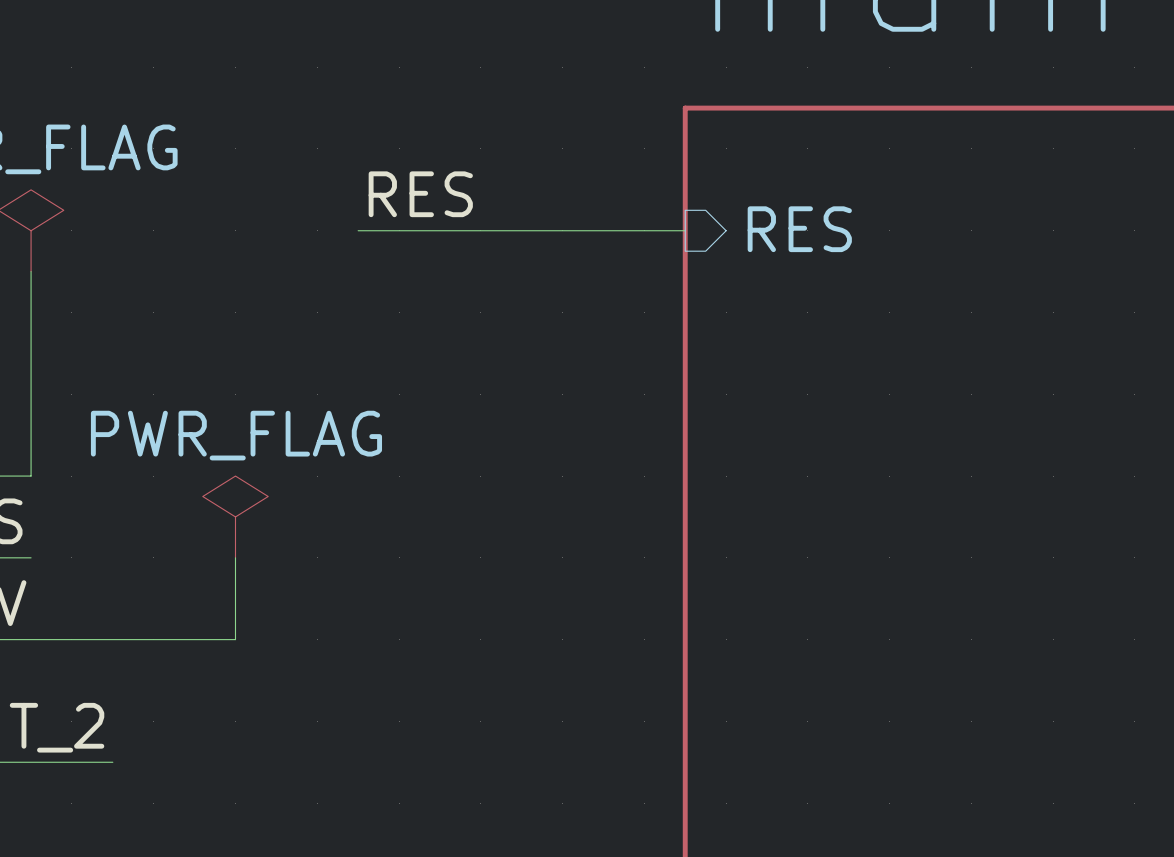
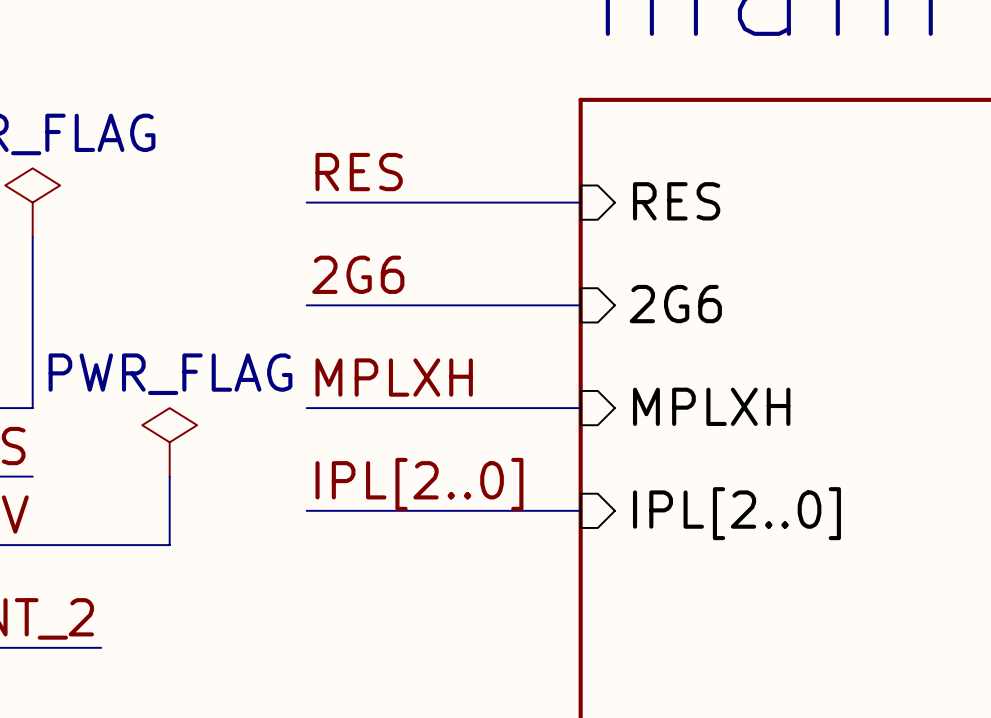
label: none -> 2G6 (358, 274)
sheet pin: none -> 2G6 (675, 304)
wire: none -> (306, 305) (580, 305)
label: none -> MPLXH (394, 377)
sheet pin: none -> MPLXH (711, 406)
wire: none -> (306, 408) (580, 408)
power symbol position: PWR_FLAG (235, 516) -> PWR_FLAG (169, 442)
wire: (235, 557) (235, 639) (194, 639) -> (169, 476) (169, 545)
label: none -> IPL[2..0] (419, 484)
bus: none -> (306, 510) (580, 510)
sheet pin: none -> IPL[2..0] (736, 513)

